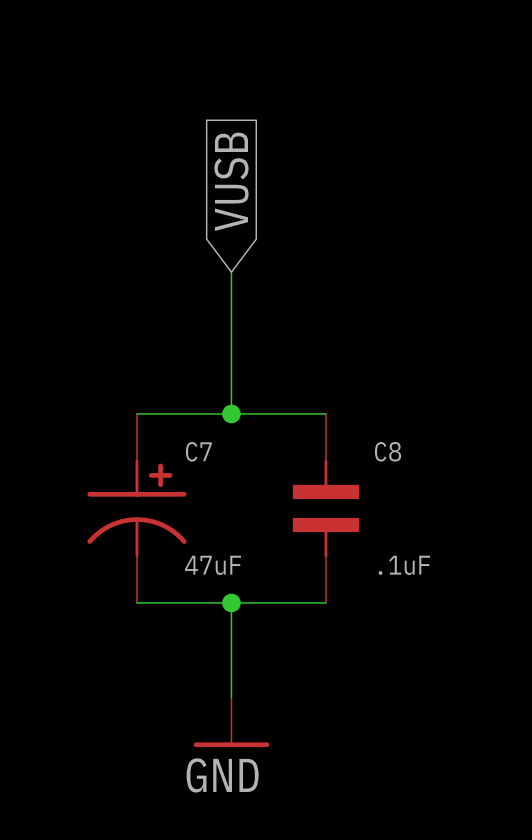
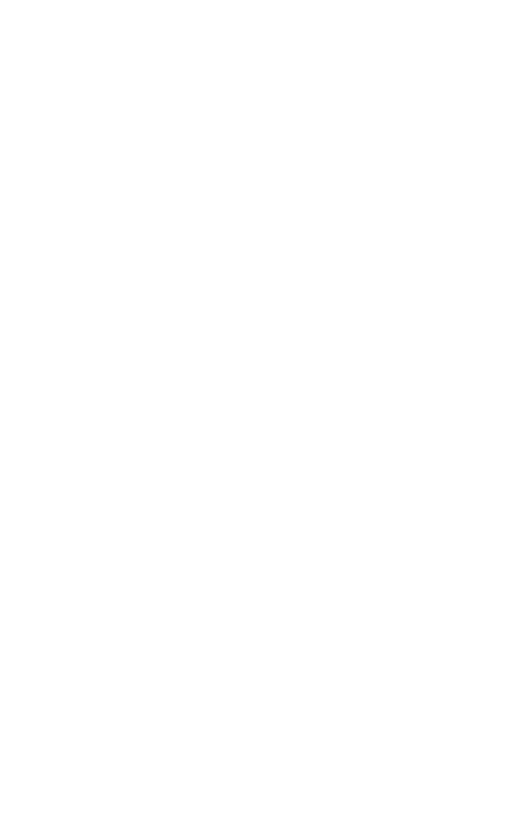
global label: VUSB (231, 181) -> none
wire: (231, 272) (231, 413) -> none
wire: (136, 413) (325, 413) -> none
junction: (231, 413) -> none
C7: 47uF (136, 508) -> none
C8: .1uF (325, 508) -> none
wire: (136, 602) (325, 602) -> none
wire: (231, 602) (231, 697) -> none
junction: (231, 602) -> none
power symbol: GND (231, 722) -> none

